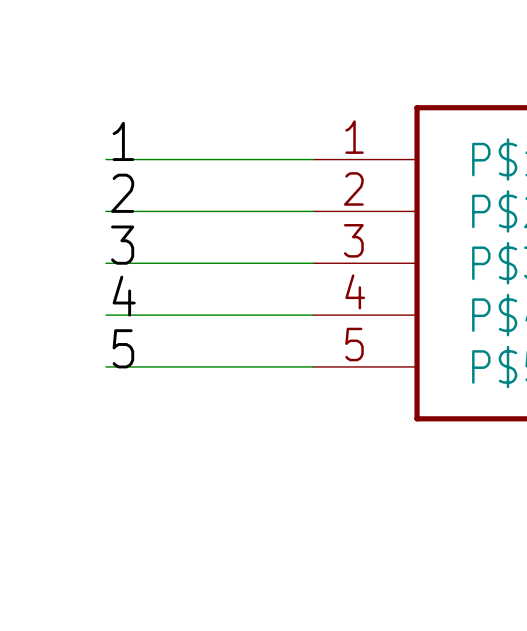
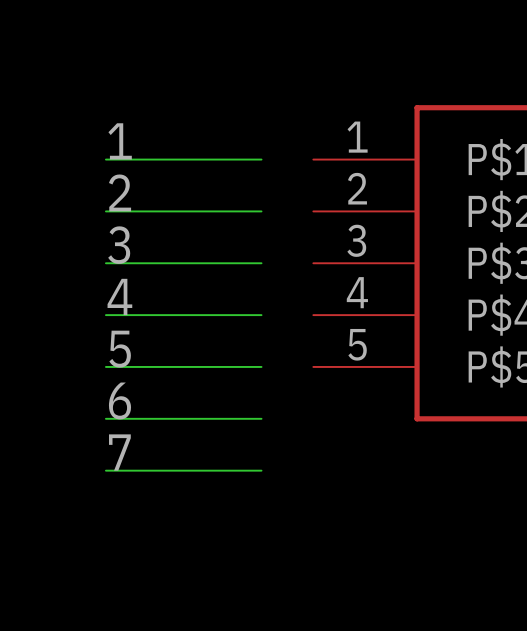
wire: (261, 159) (313, 159) -> none
wire: (261, 211) (313, 211) -> none
wire: (261, 263) (313, 263) -> none
wire: (261, 315) (313, 315) -> none
wire: (261, 366) (313, 366) -> none
label: none -> 6 (119, 400)
wire: none -> (105, 418) (261, 418)
label: none -> 7 (119, 452)
wire: none -> (105, 470) (261, 470)

